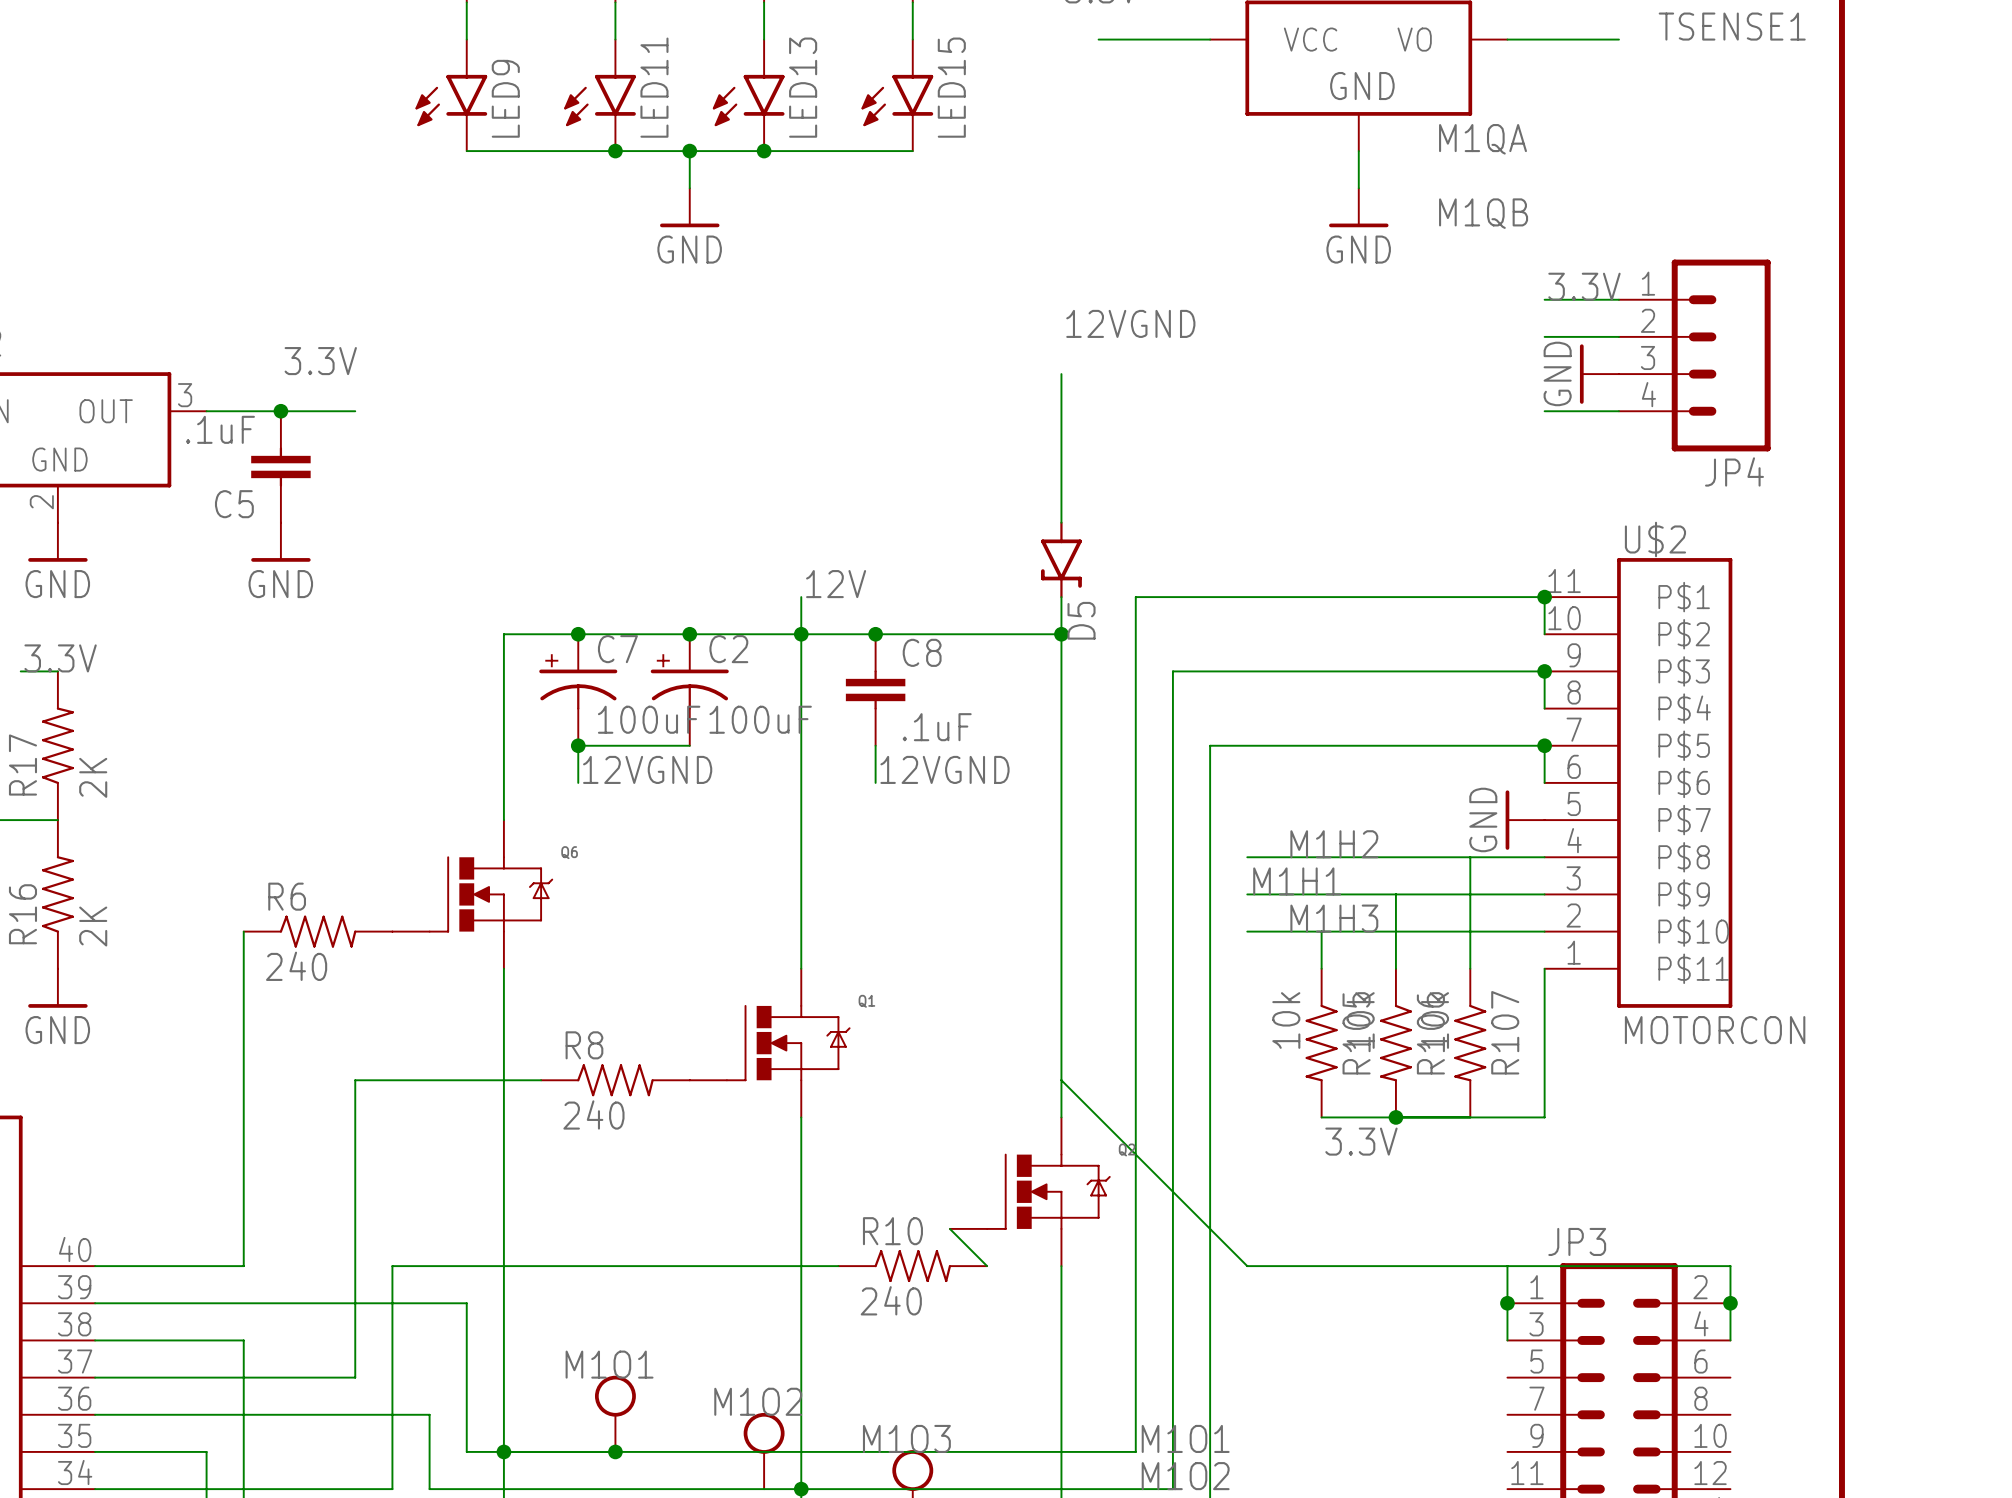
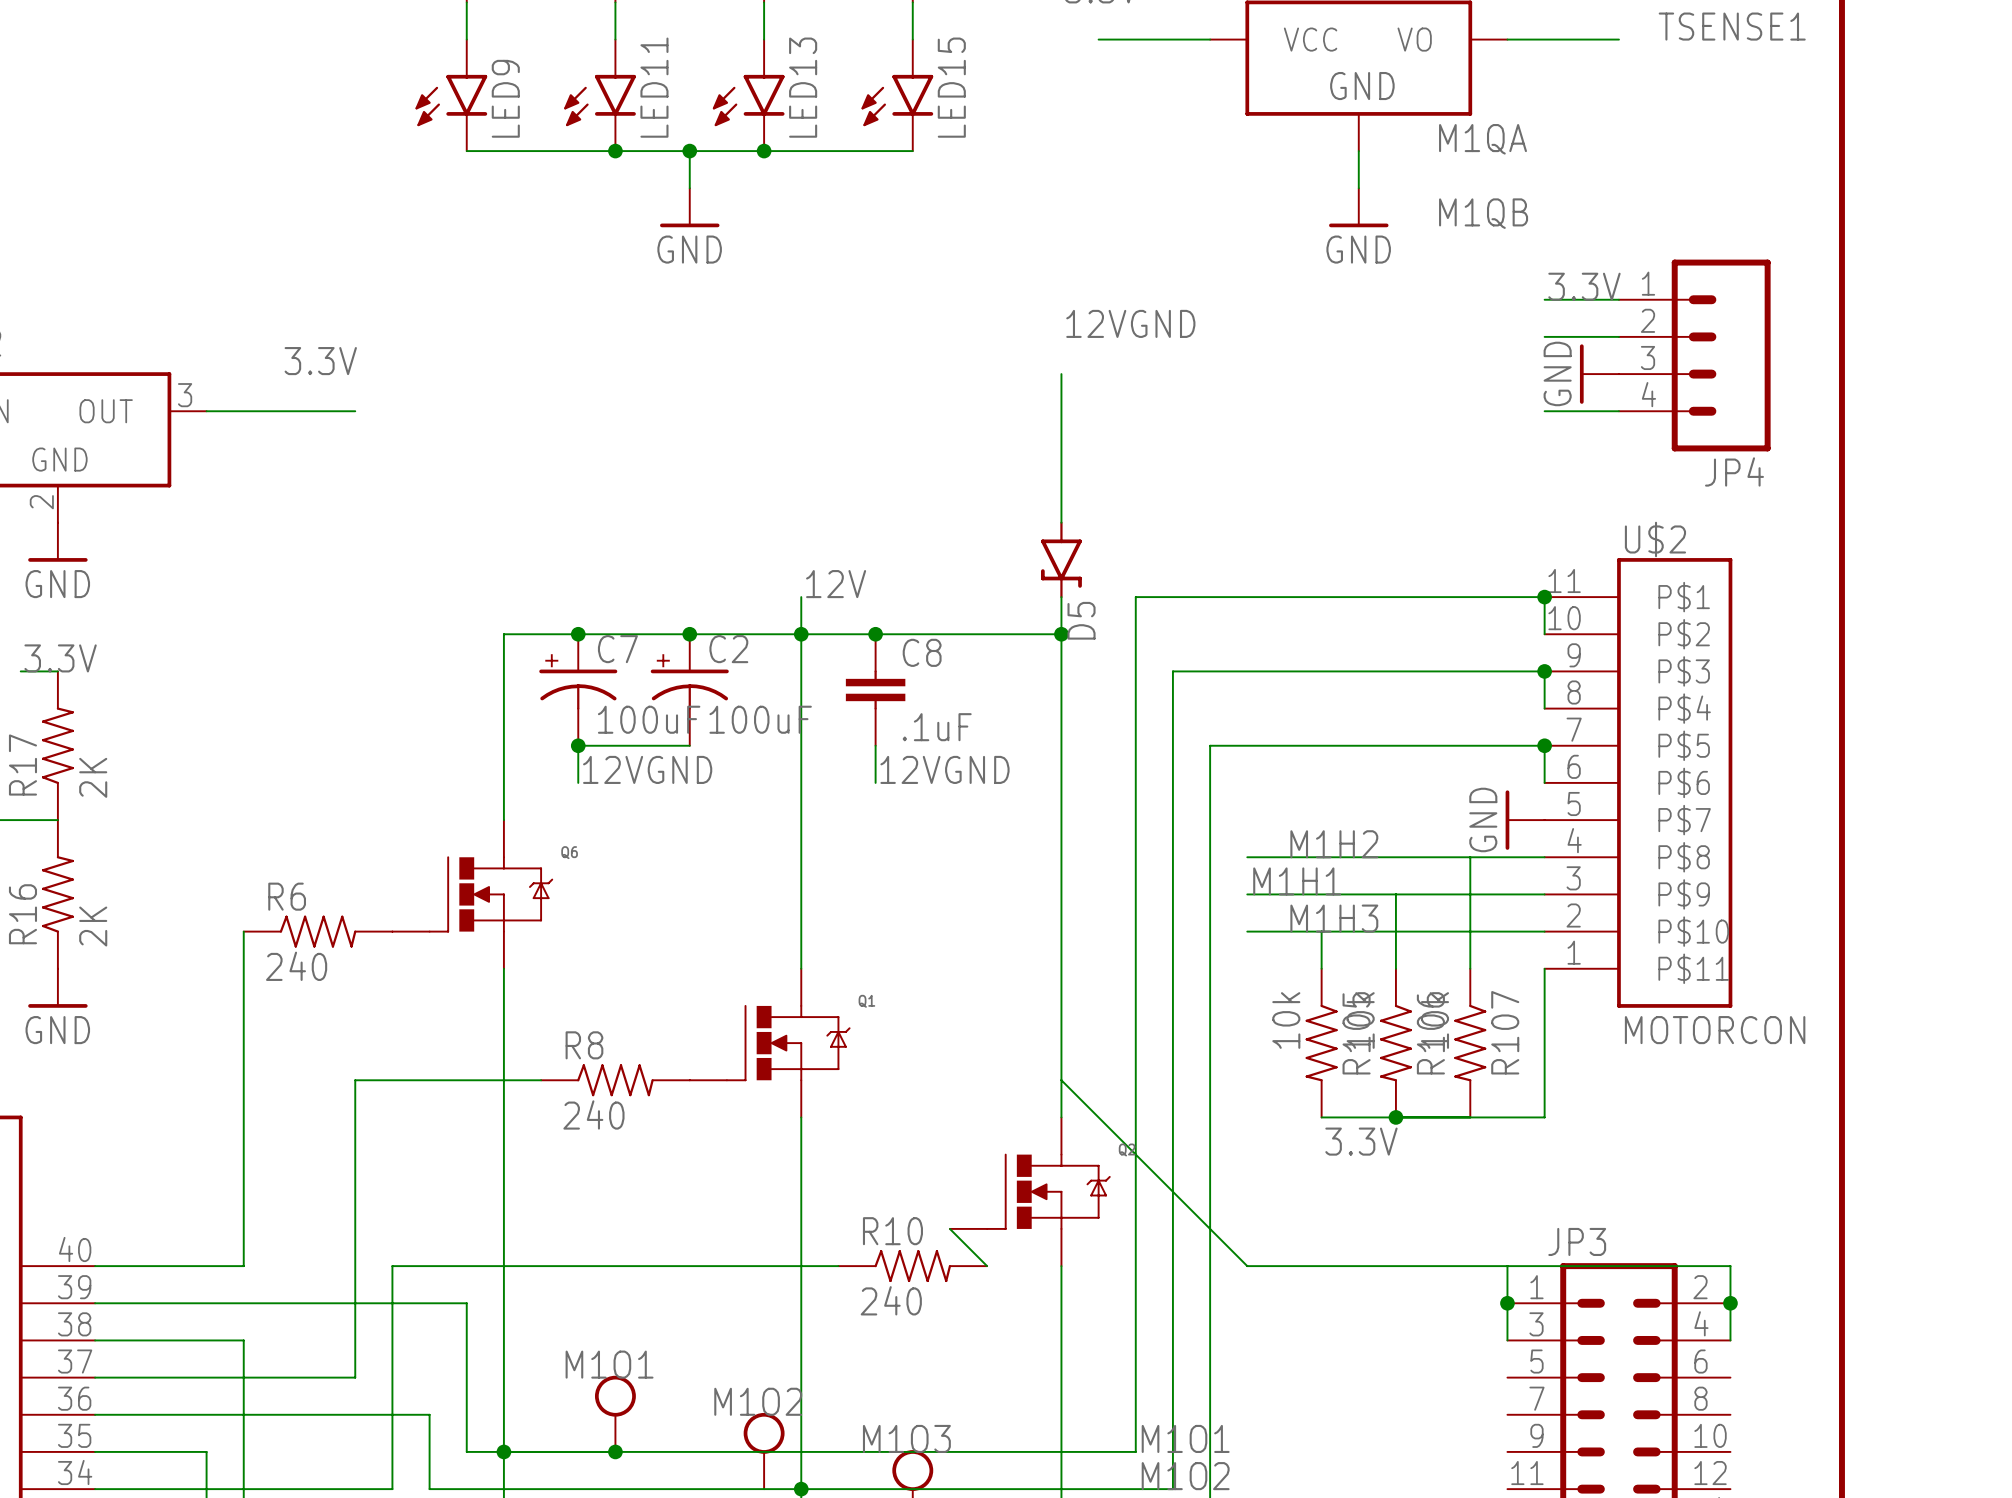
junction: (280, 411) -> none
C5: .1uF (280, 467) -> none
power symbol: GND (280, 542) -> none

